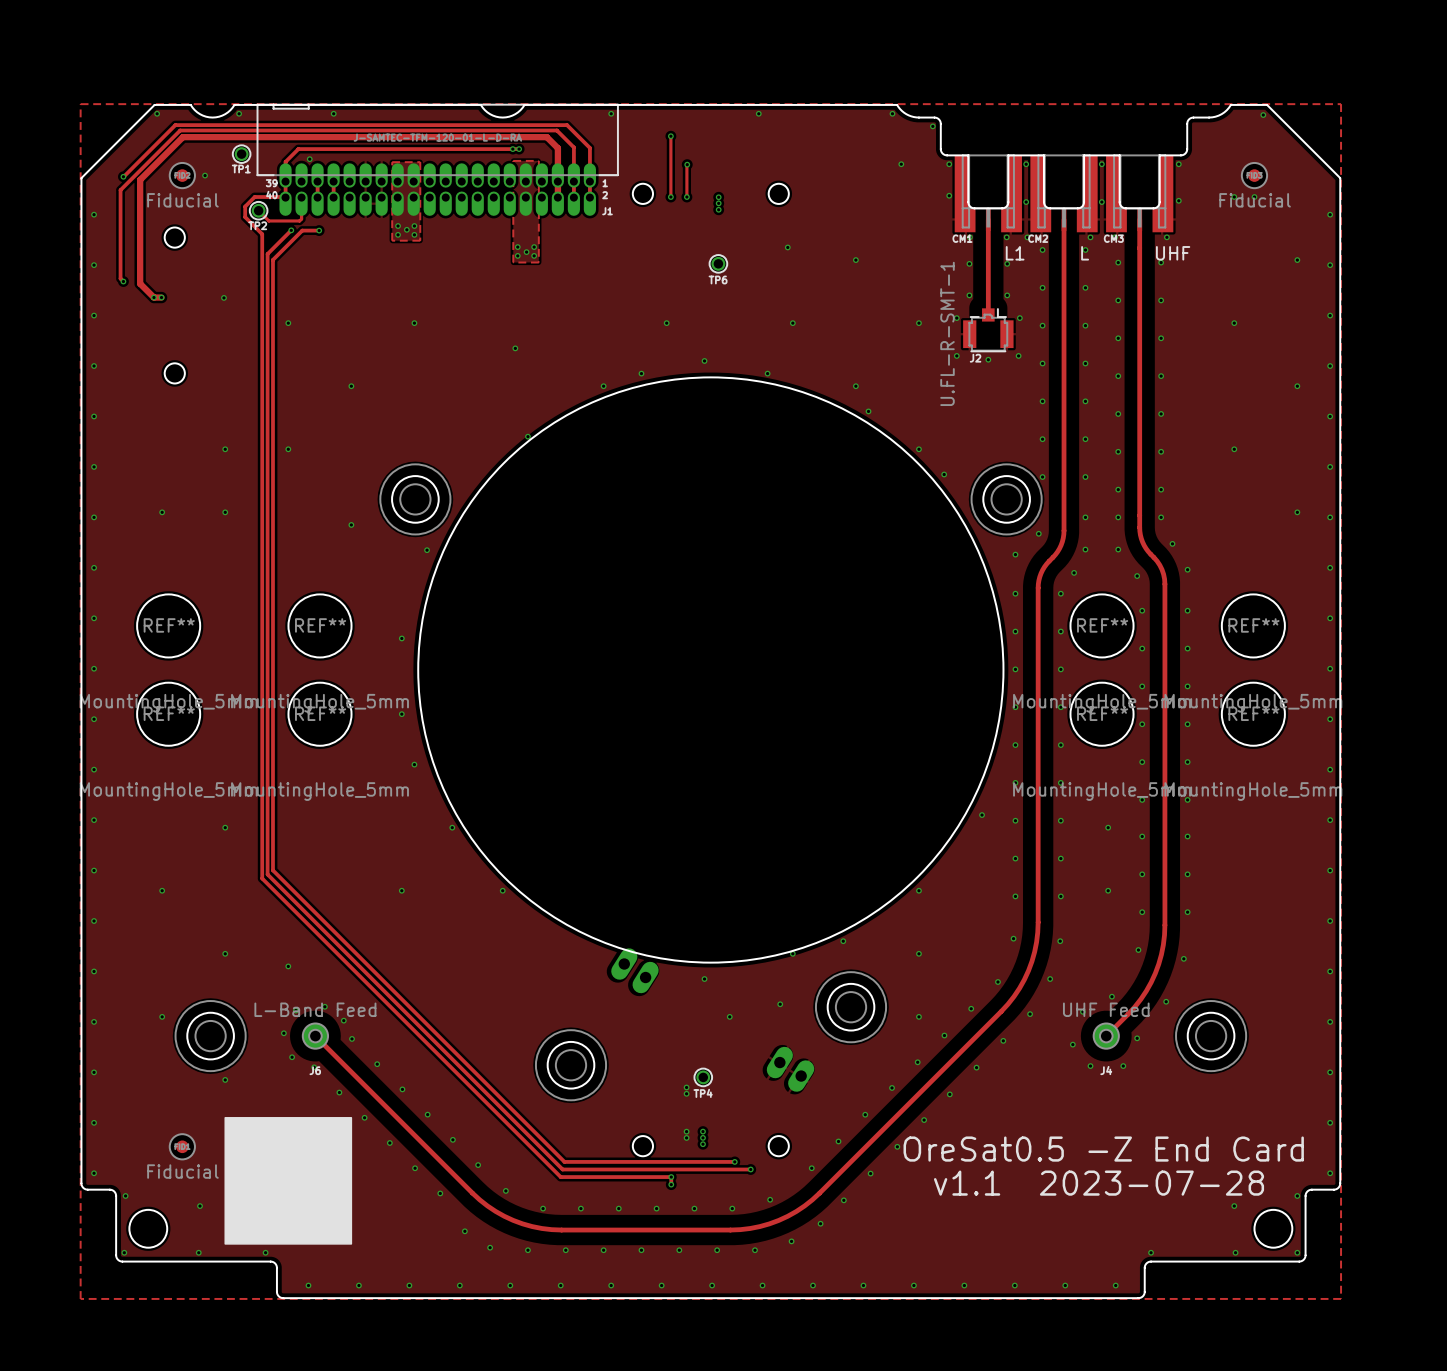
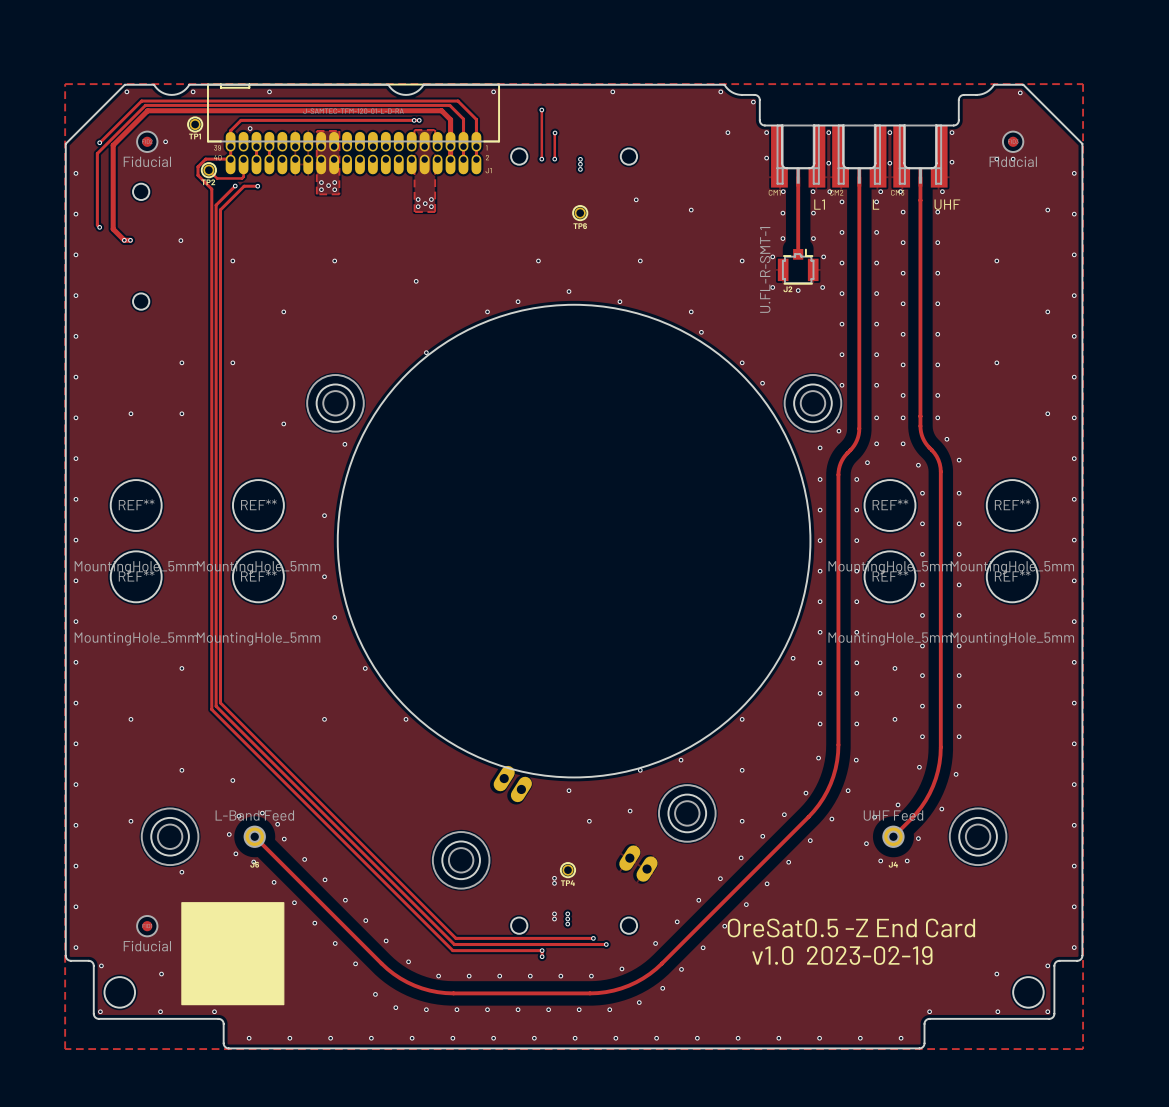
text: v1.1 2023-07-28 (1099, 1183) -> v1.0 2023-02-19 (842, 955)

